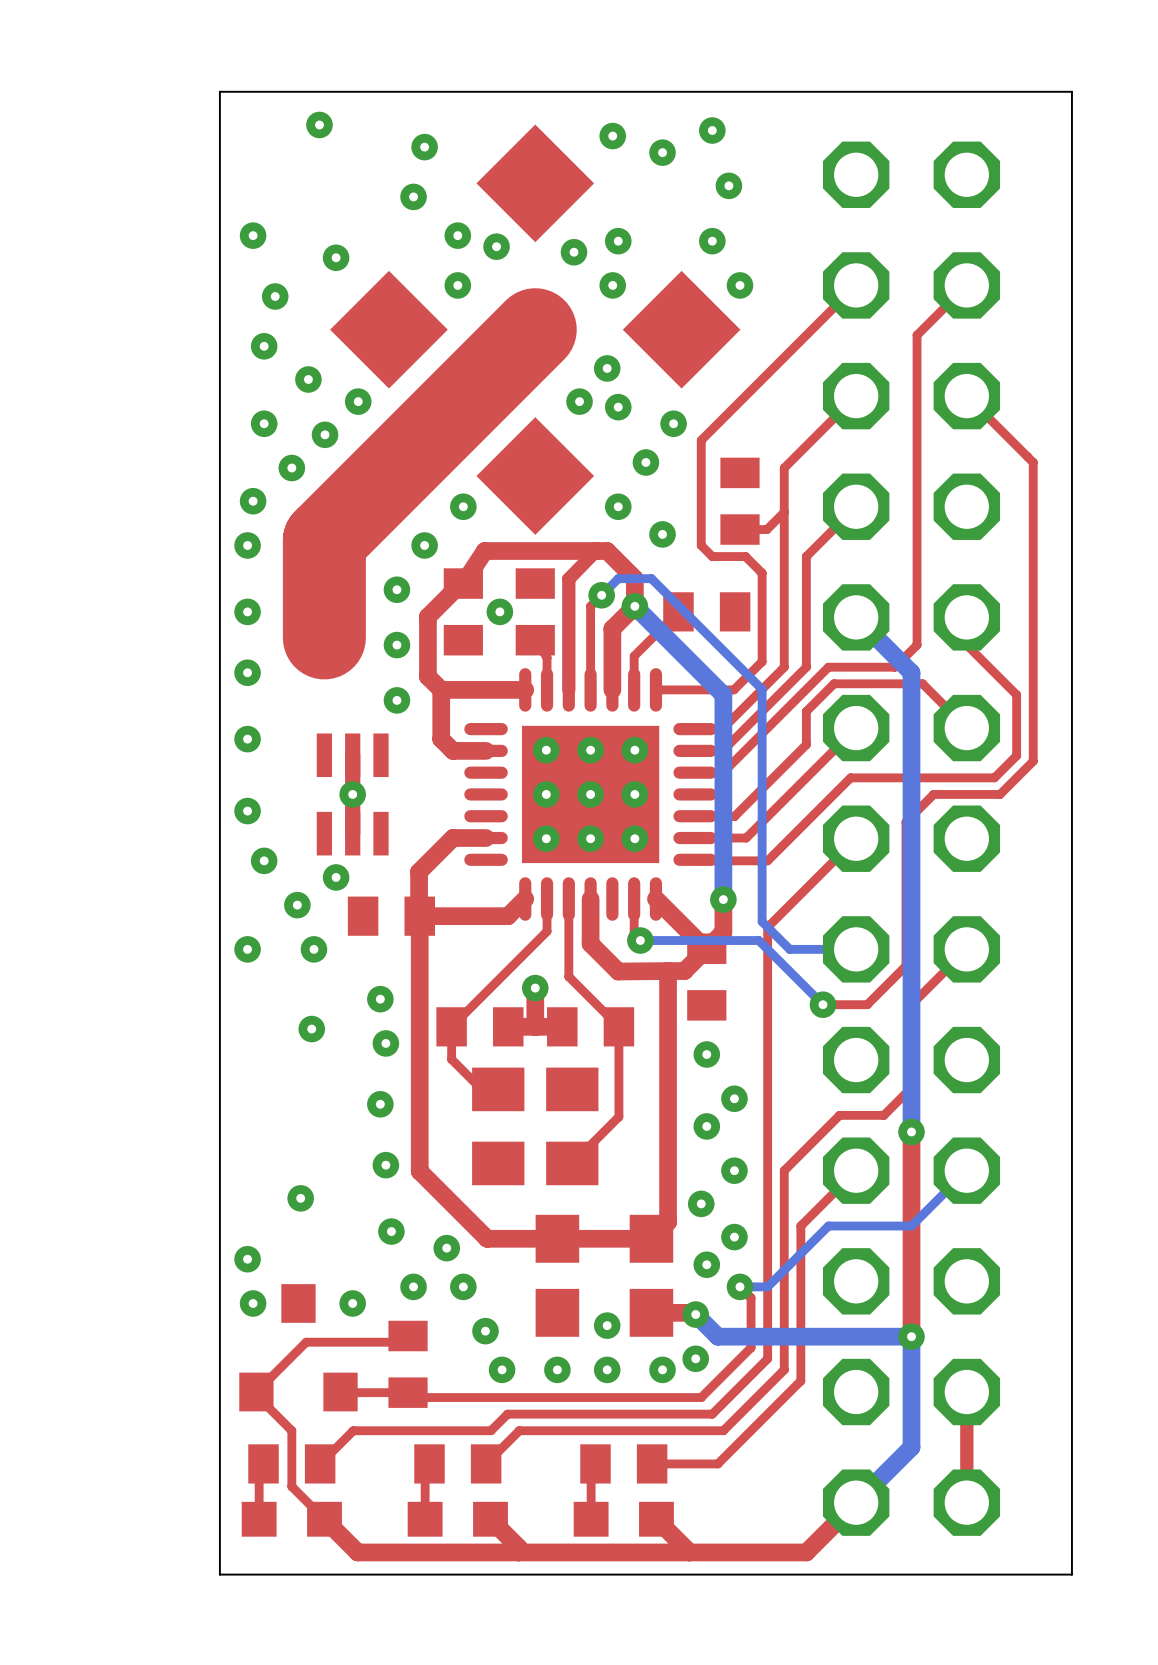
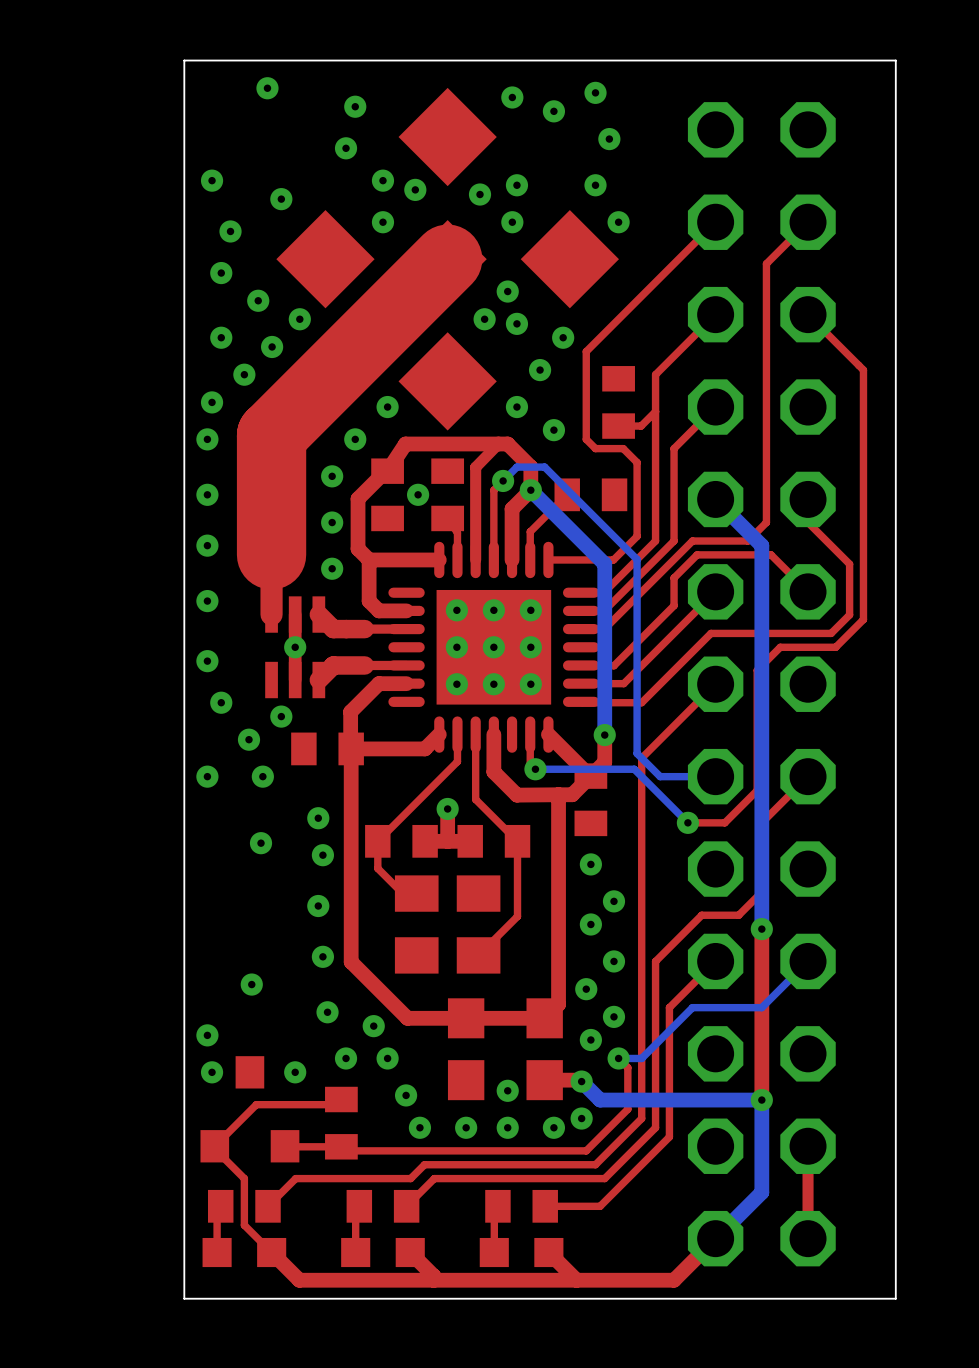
part footprint: [330, 124, 741, 535] -> [276, 87, 619, 431]
top track: none -> (271, 516) (271, 614)
top track: none -> (318, 614) (333, 629) (406, 629)
top track: none -> (406, 665) (333, 665) (318, 680)

